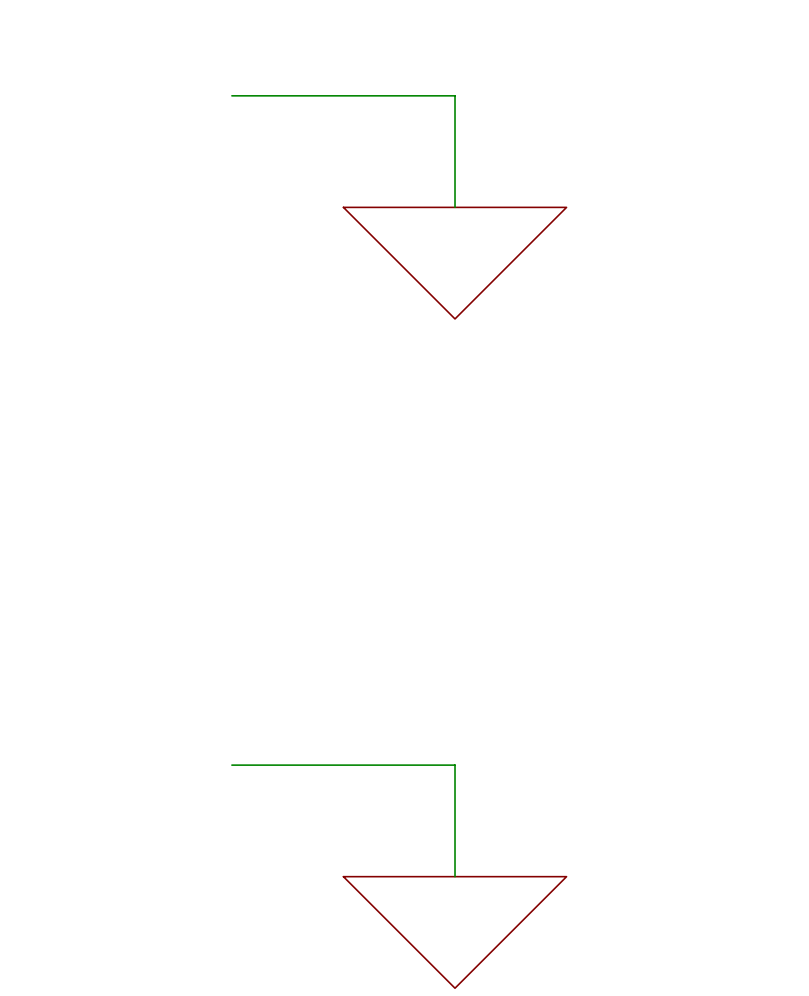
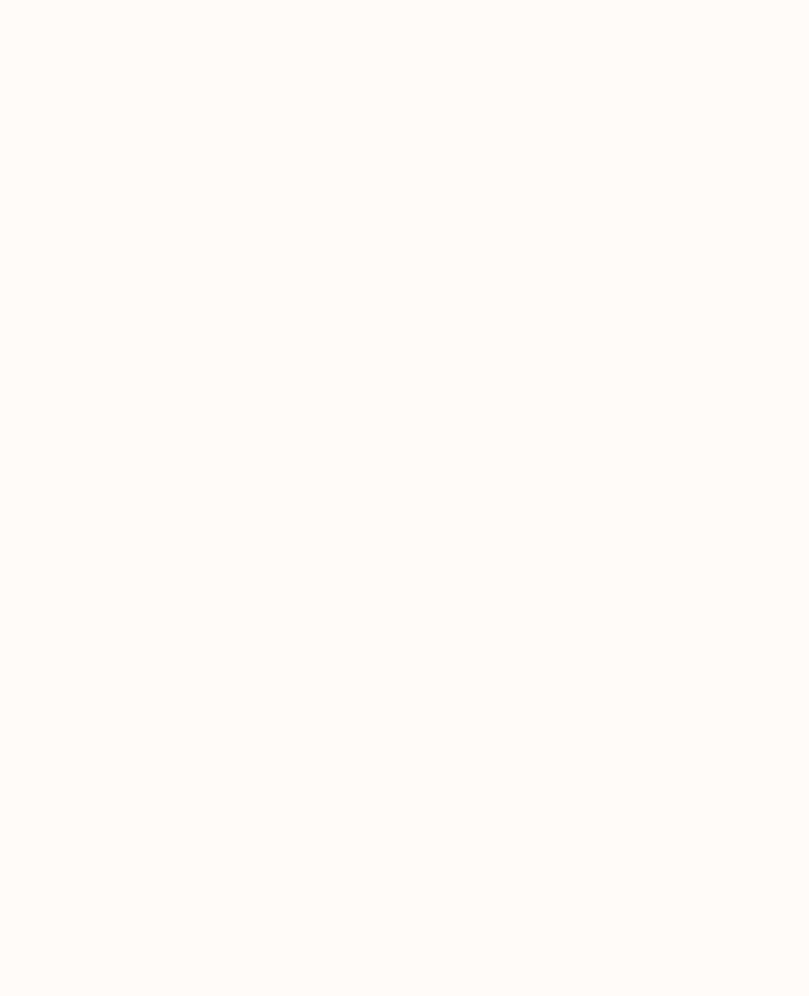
wire: (231, 95) (455, 95) (455, 207) -> none
power symbol: (455, 263) -> none
wire: (231, 765) (455, 765) (455, 876) -> none
power symbol: (455, 932) -> none

